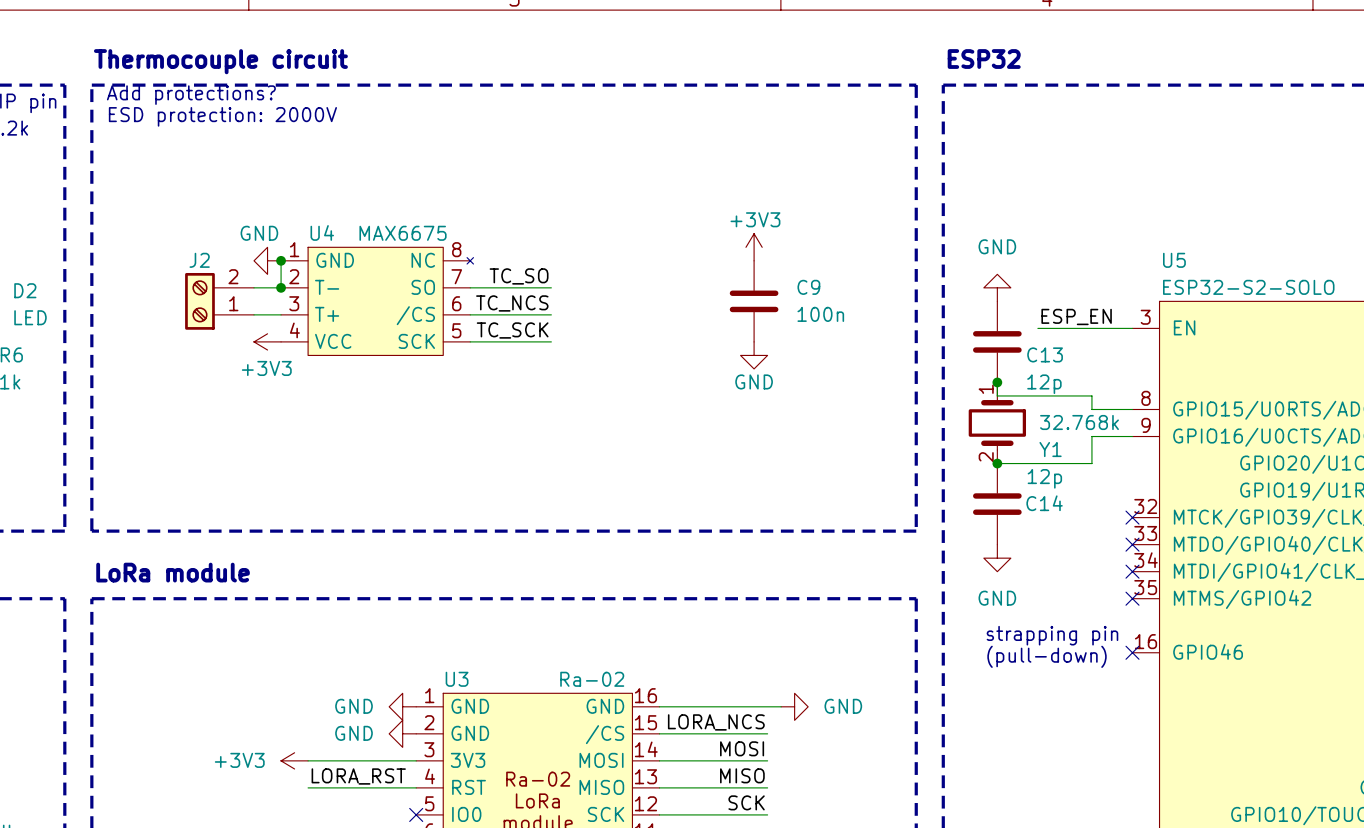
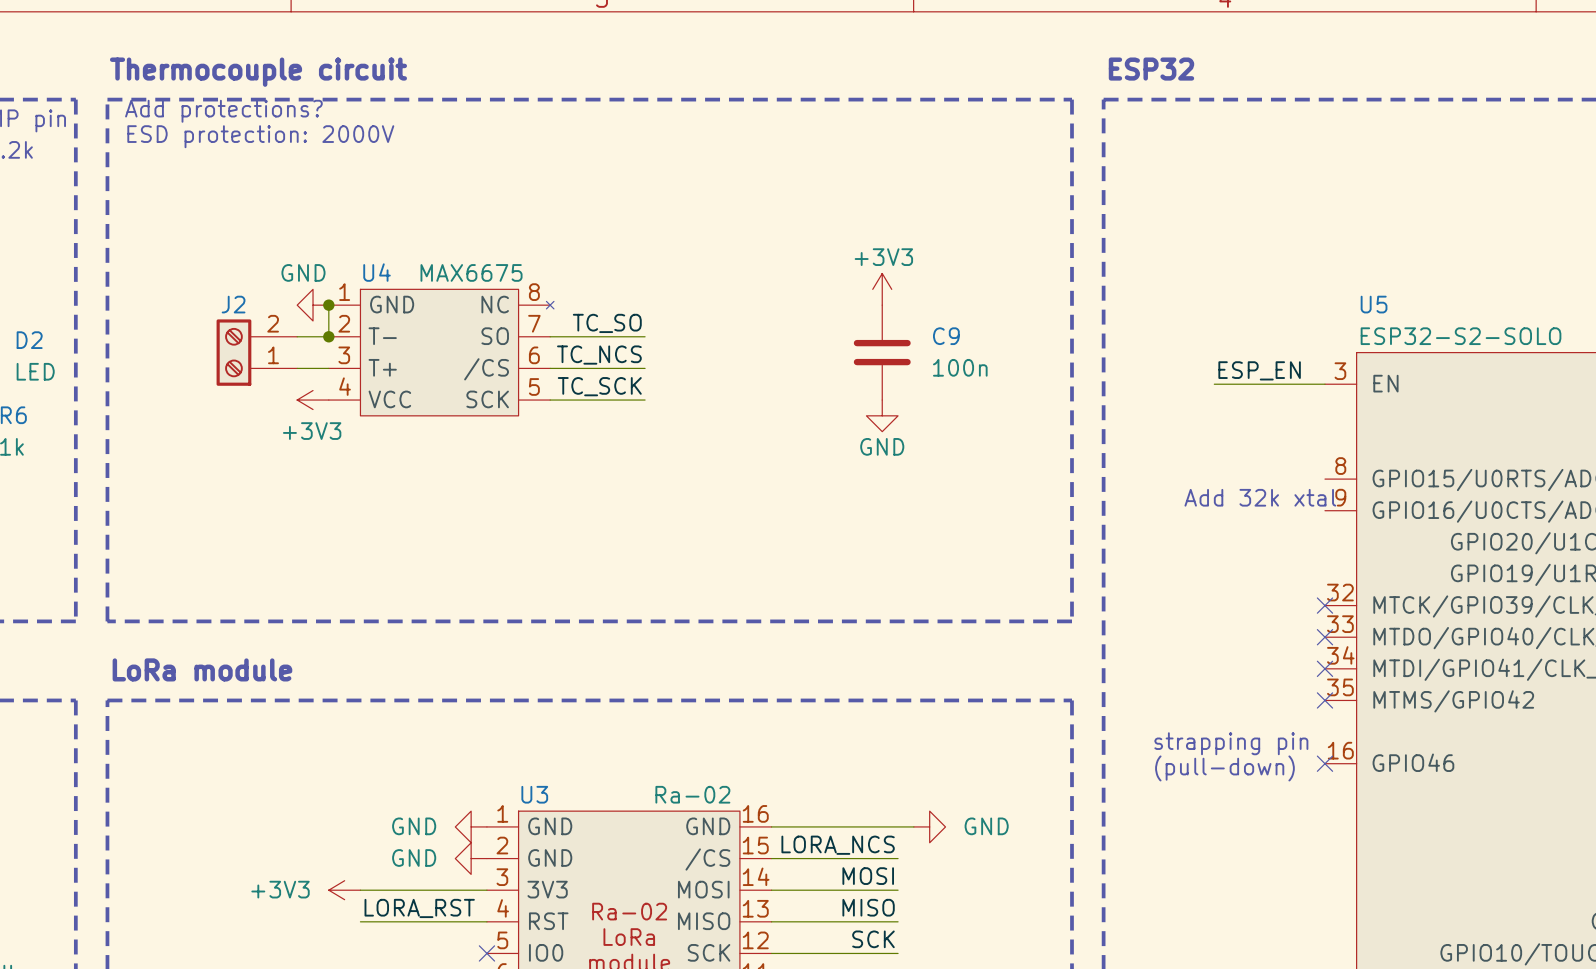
power symbol: GND (997, 287) -> none
C13: 12p (997, 341) -> none
wire: (997, 382) (997, 395) (1091, 395) (1091, 409) (1132, 409) -> none
junction: (997, 382) -> none
Y1: 32.768k (997, 423) -> none
text: none -> Add 32k xtal (1260, 497)
wire: (1132, 436) (1091, 436) (1091, 463) (997, 463) -> none
junction: (997, 463) -> none
C14: 12p (997, 504) -> none
power symbol: GND (997, 558) -> none

